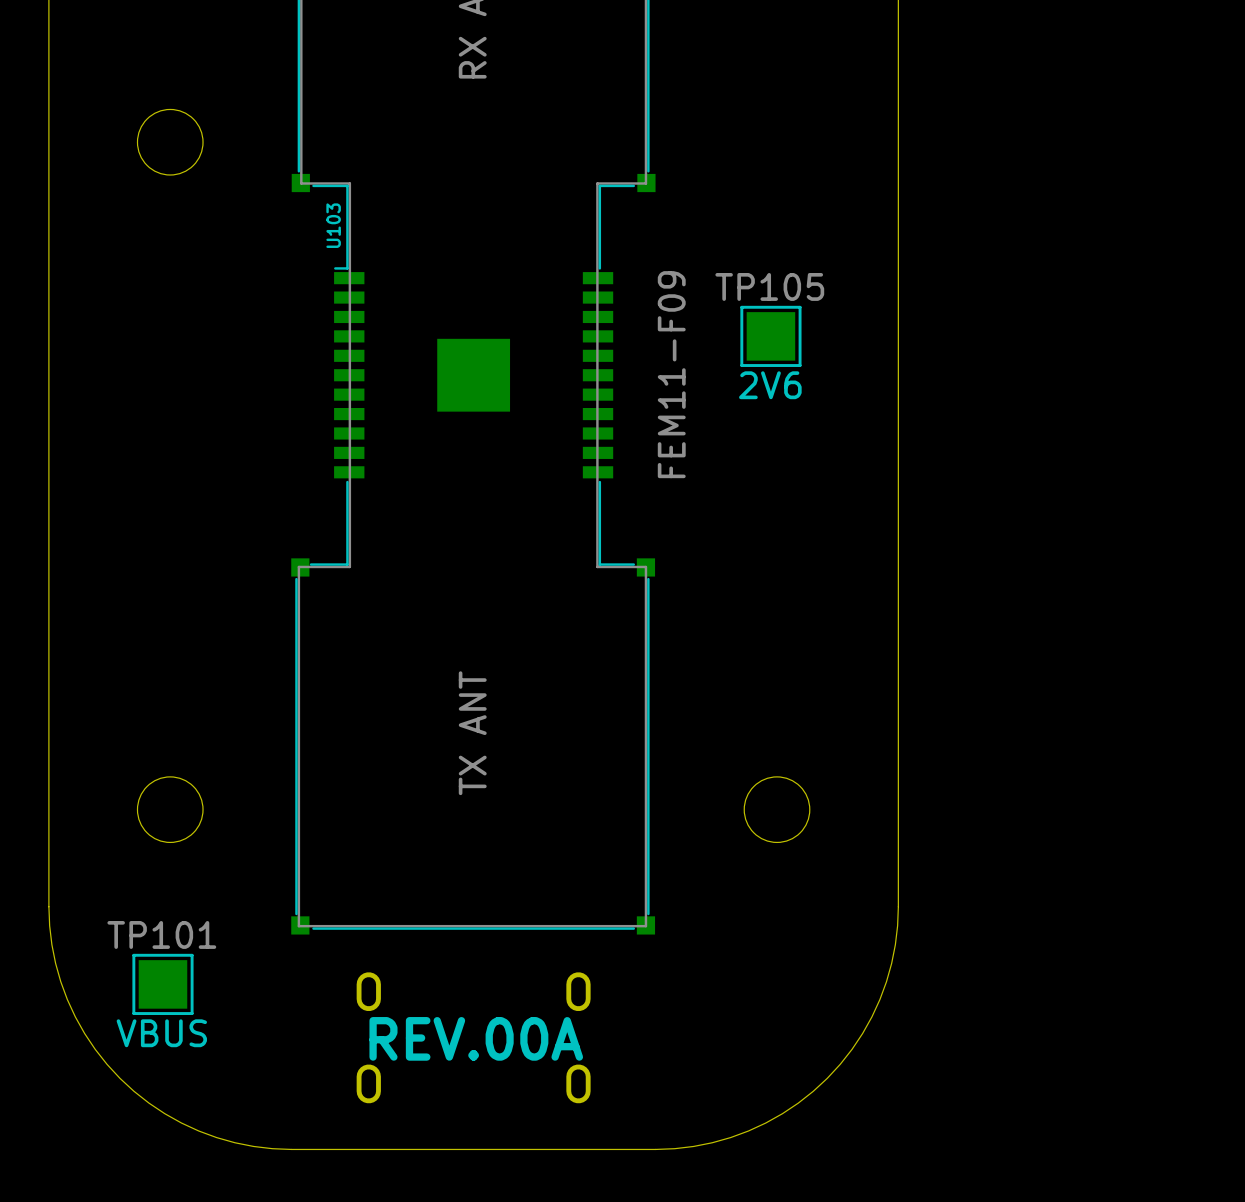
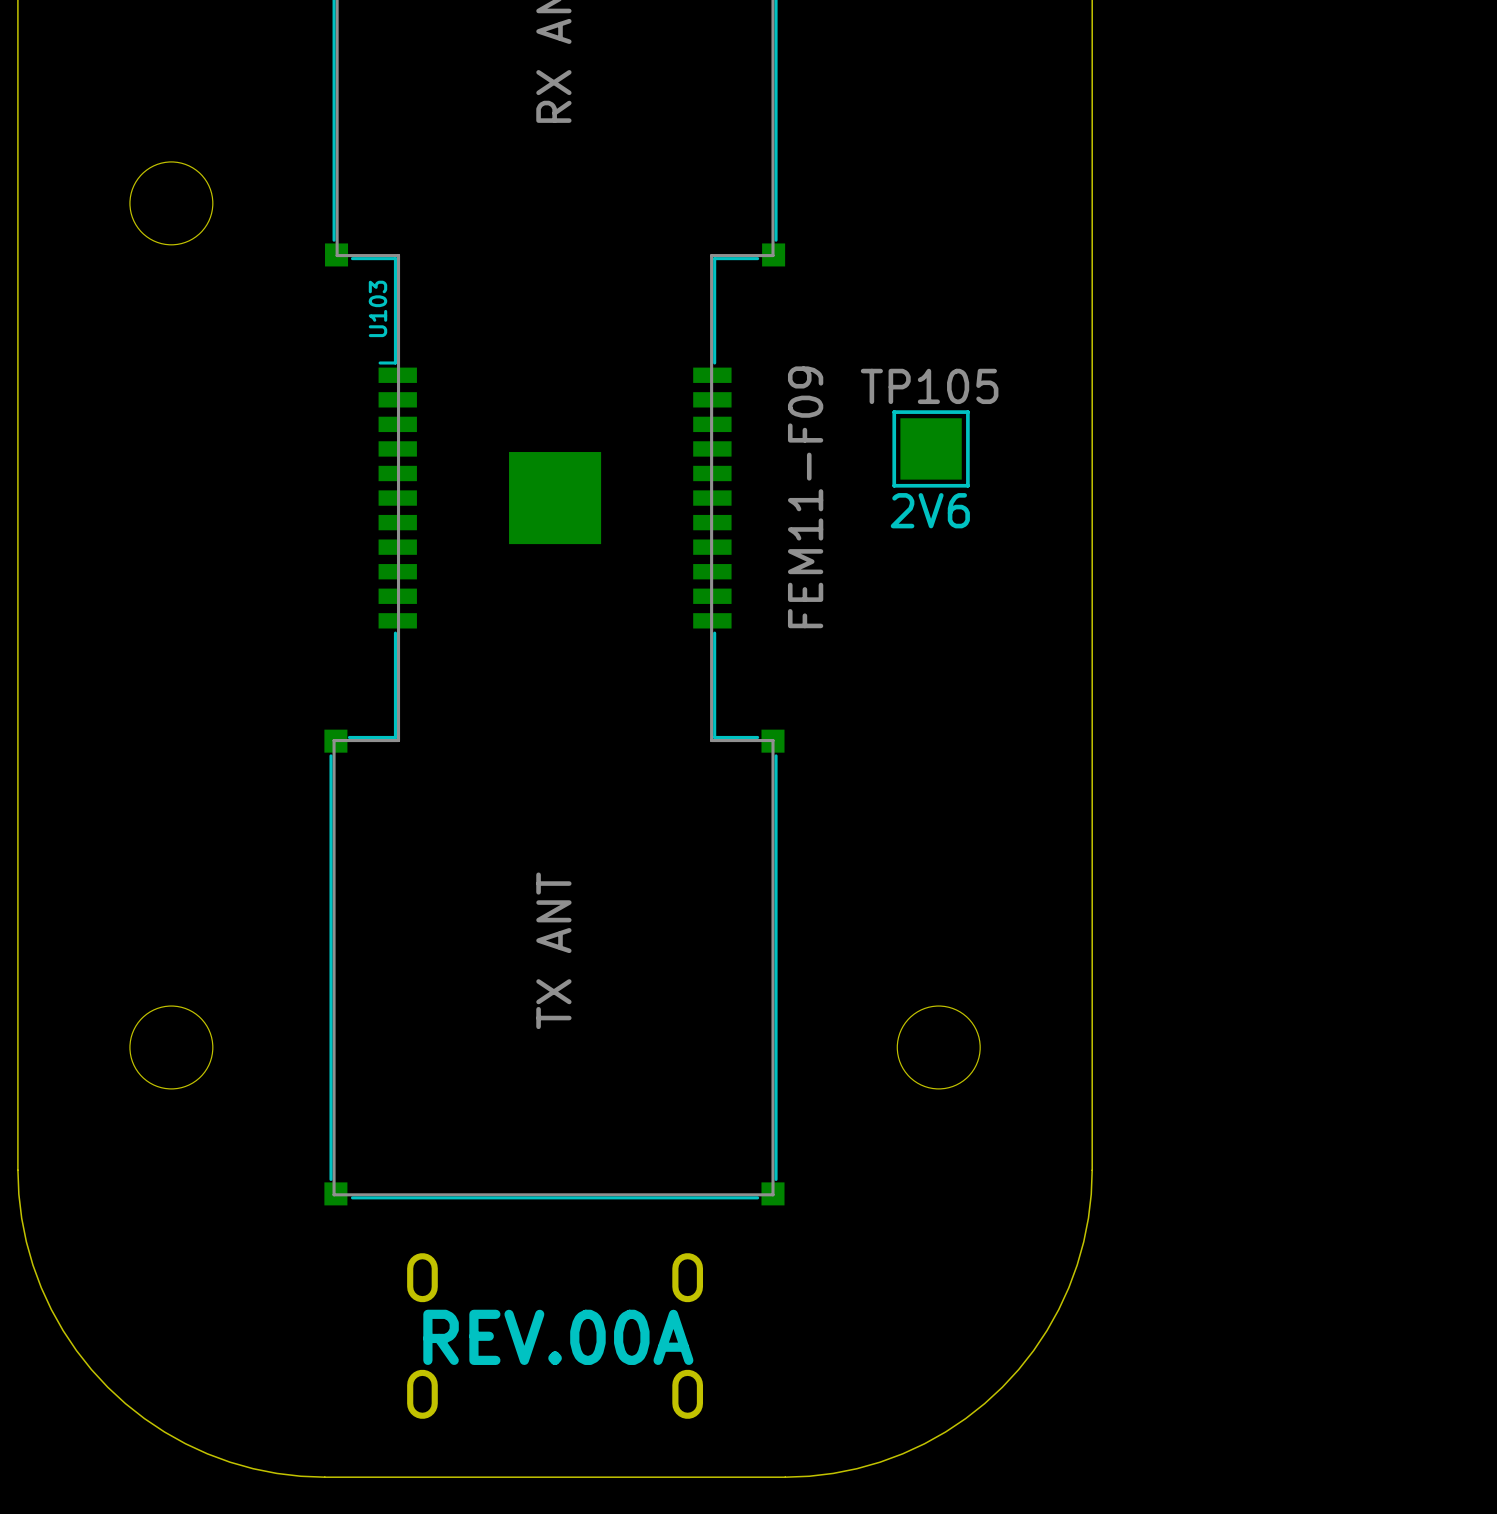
TP101: VBUS (162, 984) -> none

